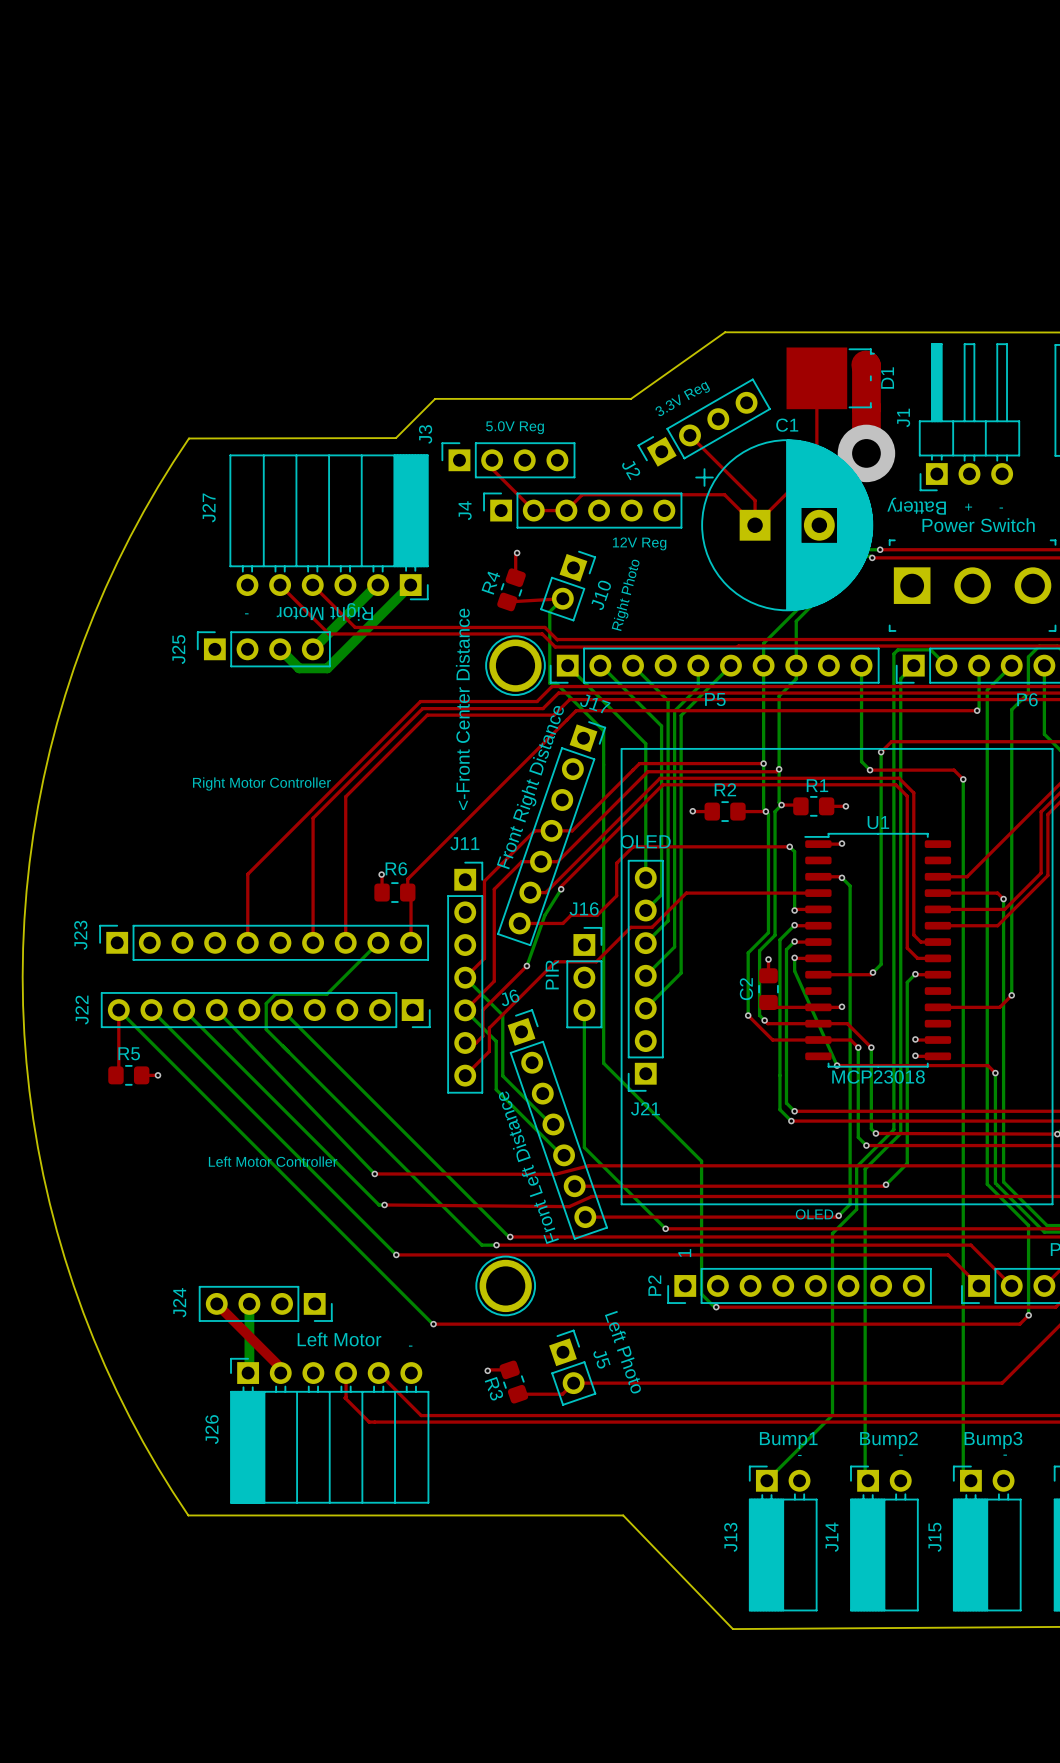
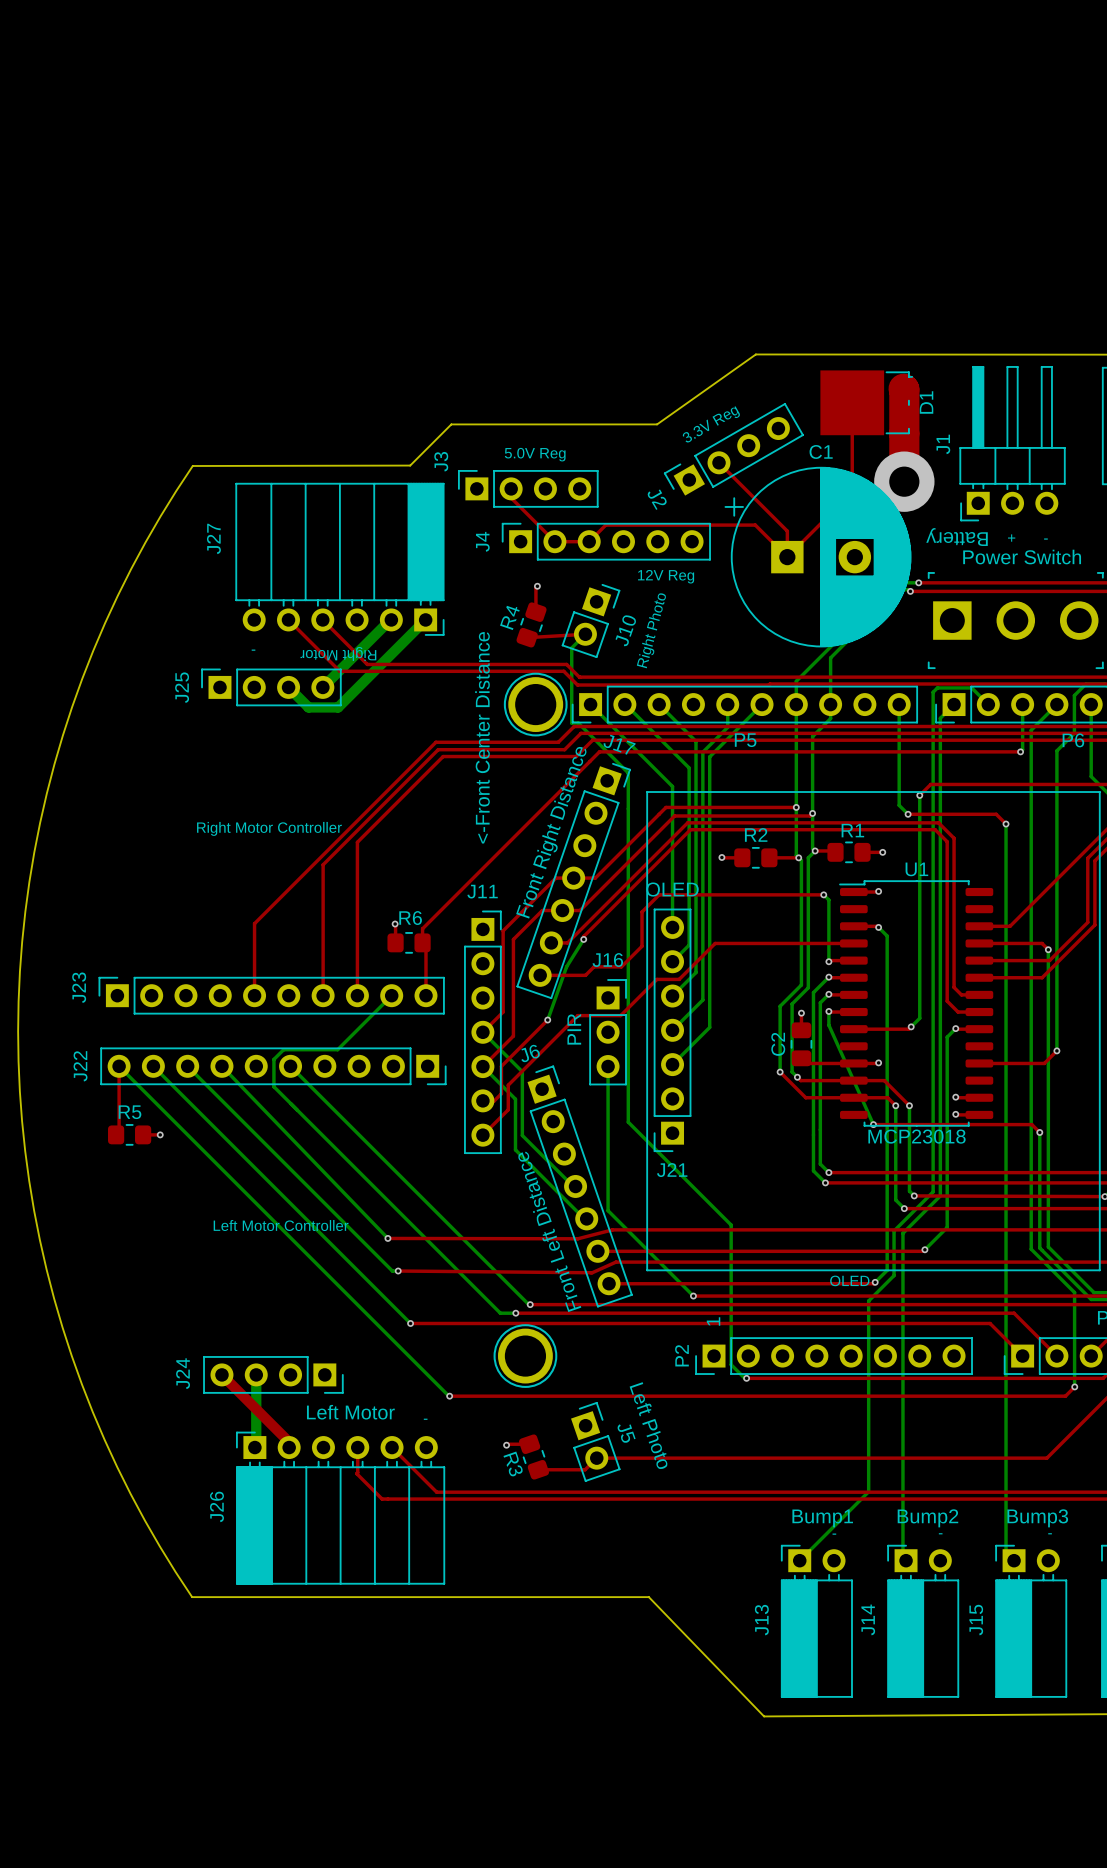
J27 value: Right Motor (324, 611) -> none
text: none -> Right Motor (338, 653)
J11 value: none -> <-Front Center Distance (482, 737)
text: <-Front Center Distance (462, 709) -> none

